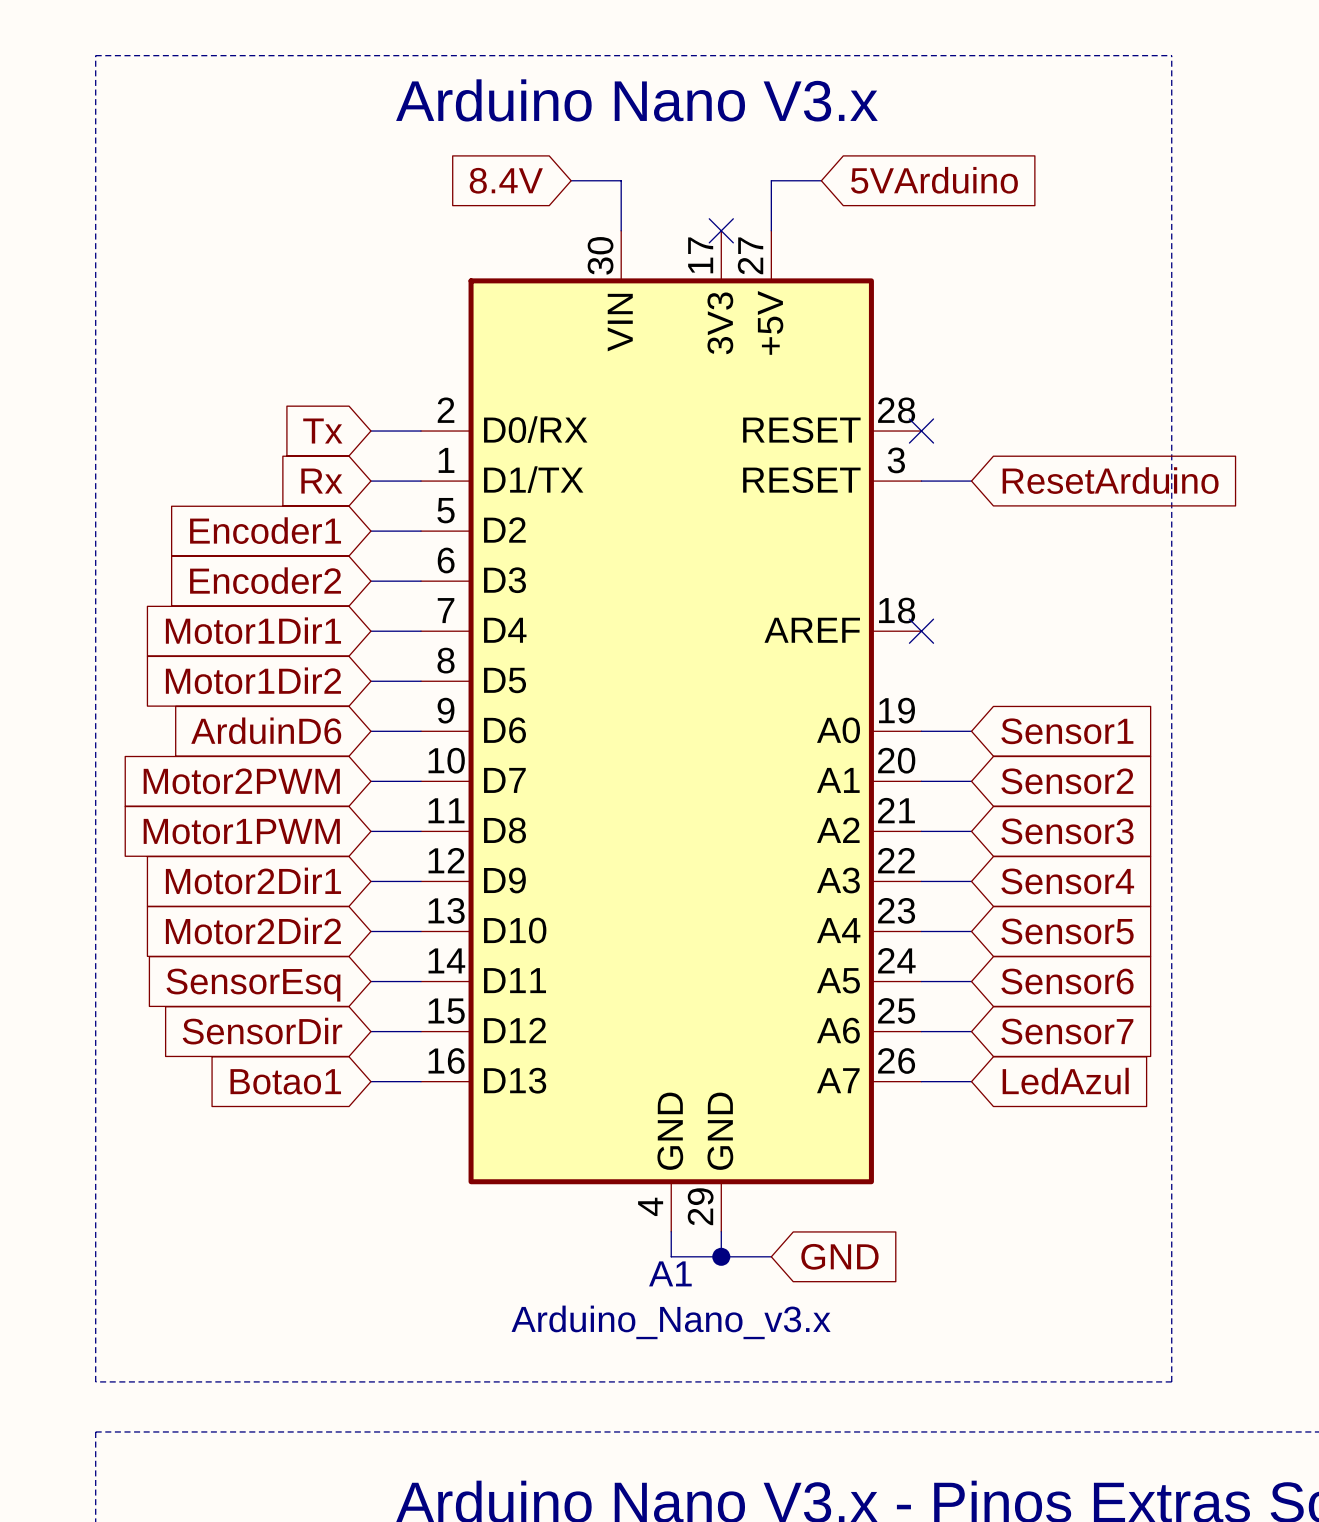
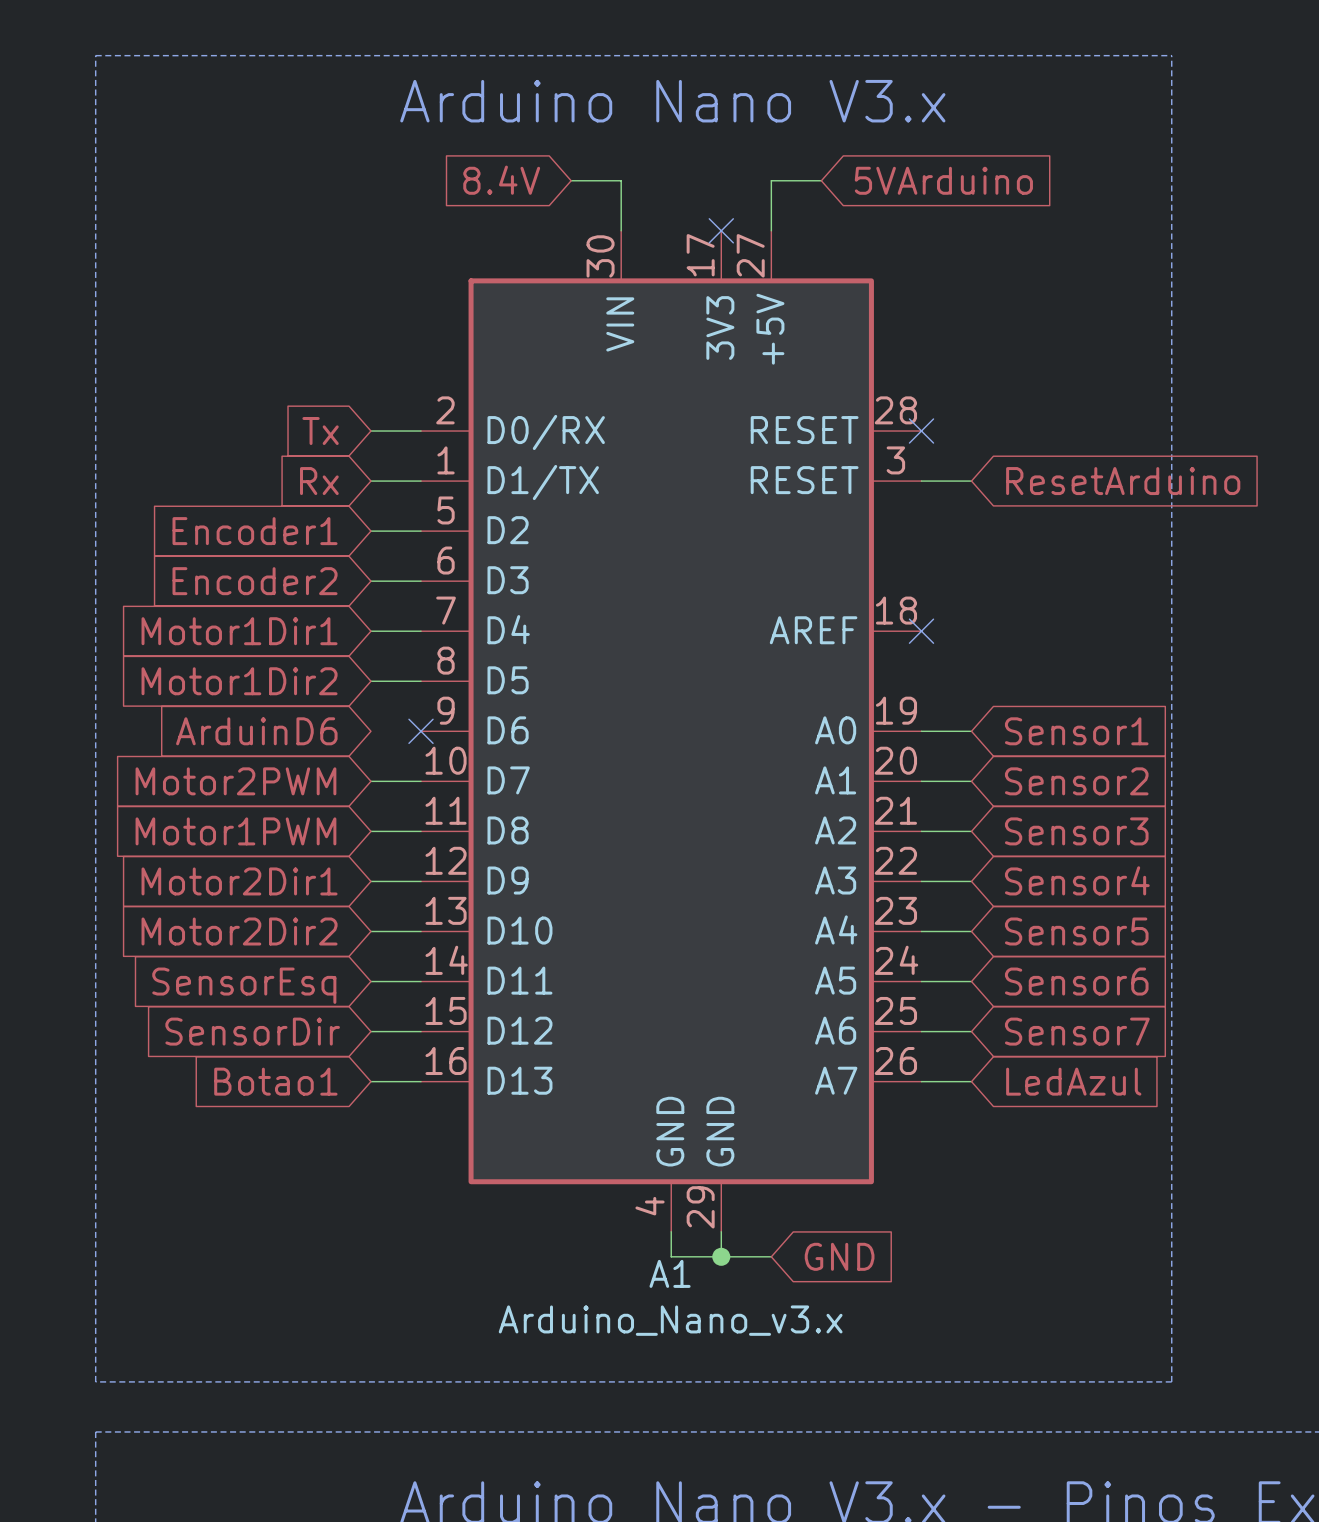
wire: (370, 731) (421, 731) -> none
no-connect mark: none -> (421, 731)

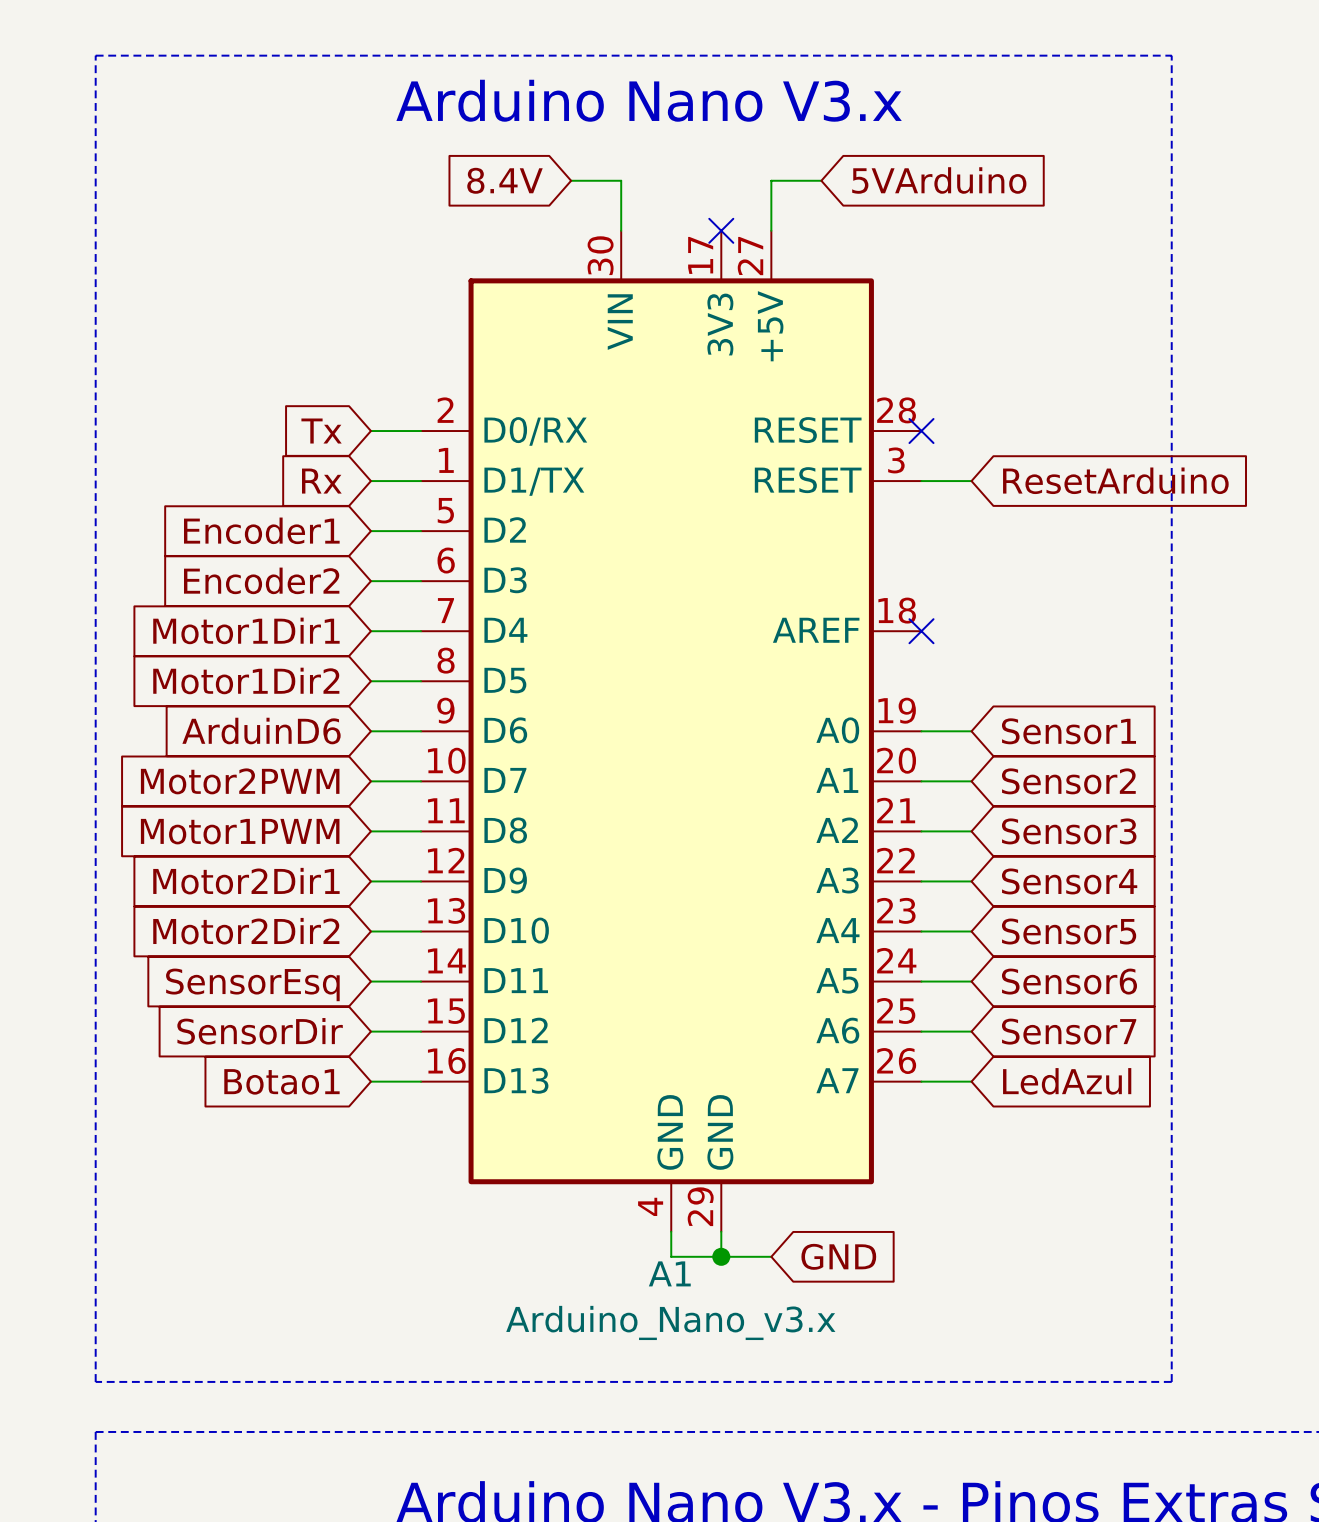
wire: none -> (370, 731) (421, 731)
no-connect mark: (421, 731) -> none

